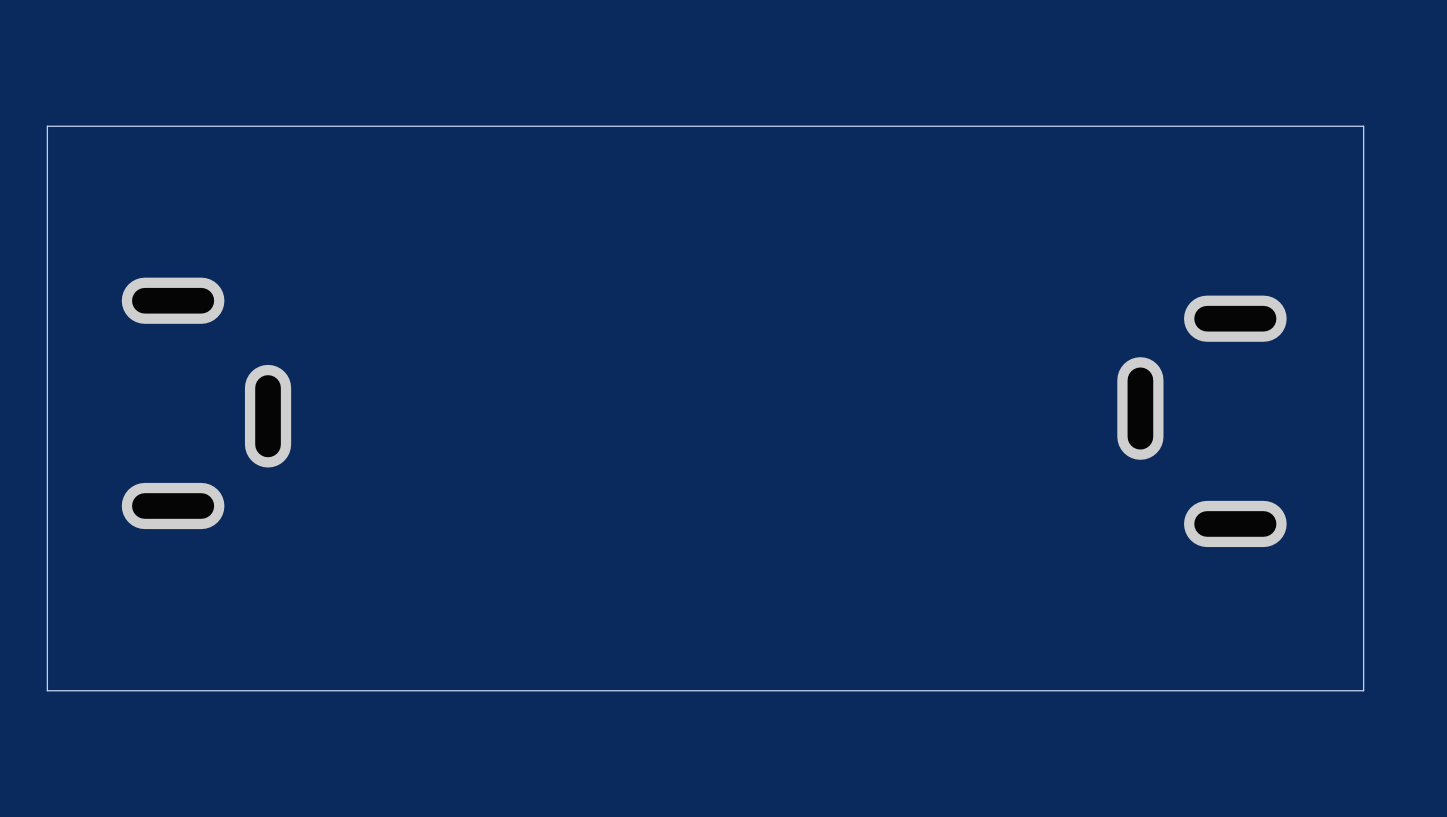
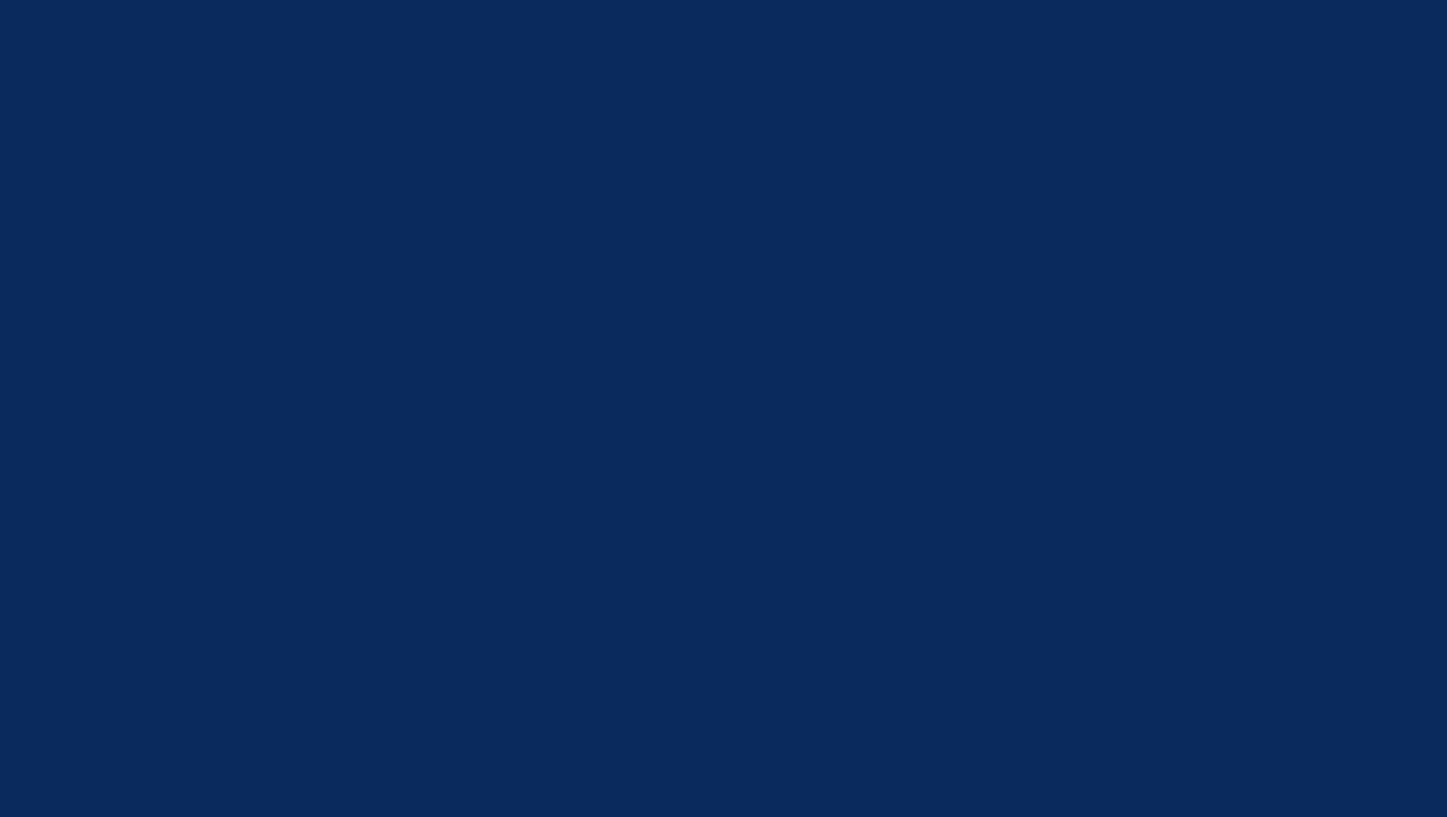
board edge: (1363, 126) (47, 126) (47, 690) (1363, 690) (1363, 126) -> none
part: (206, 403) -> none
part: (1201, 421) -> none

